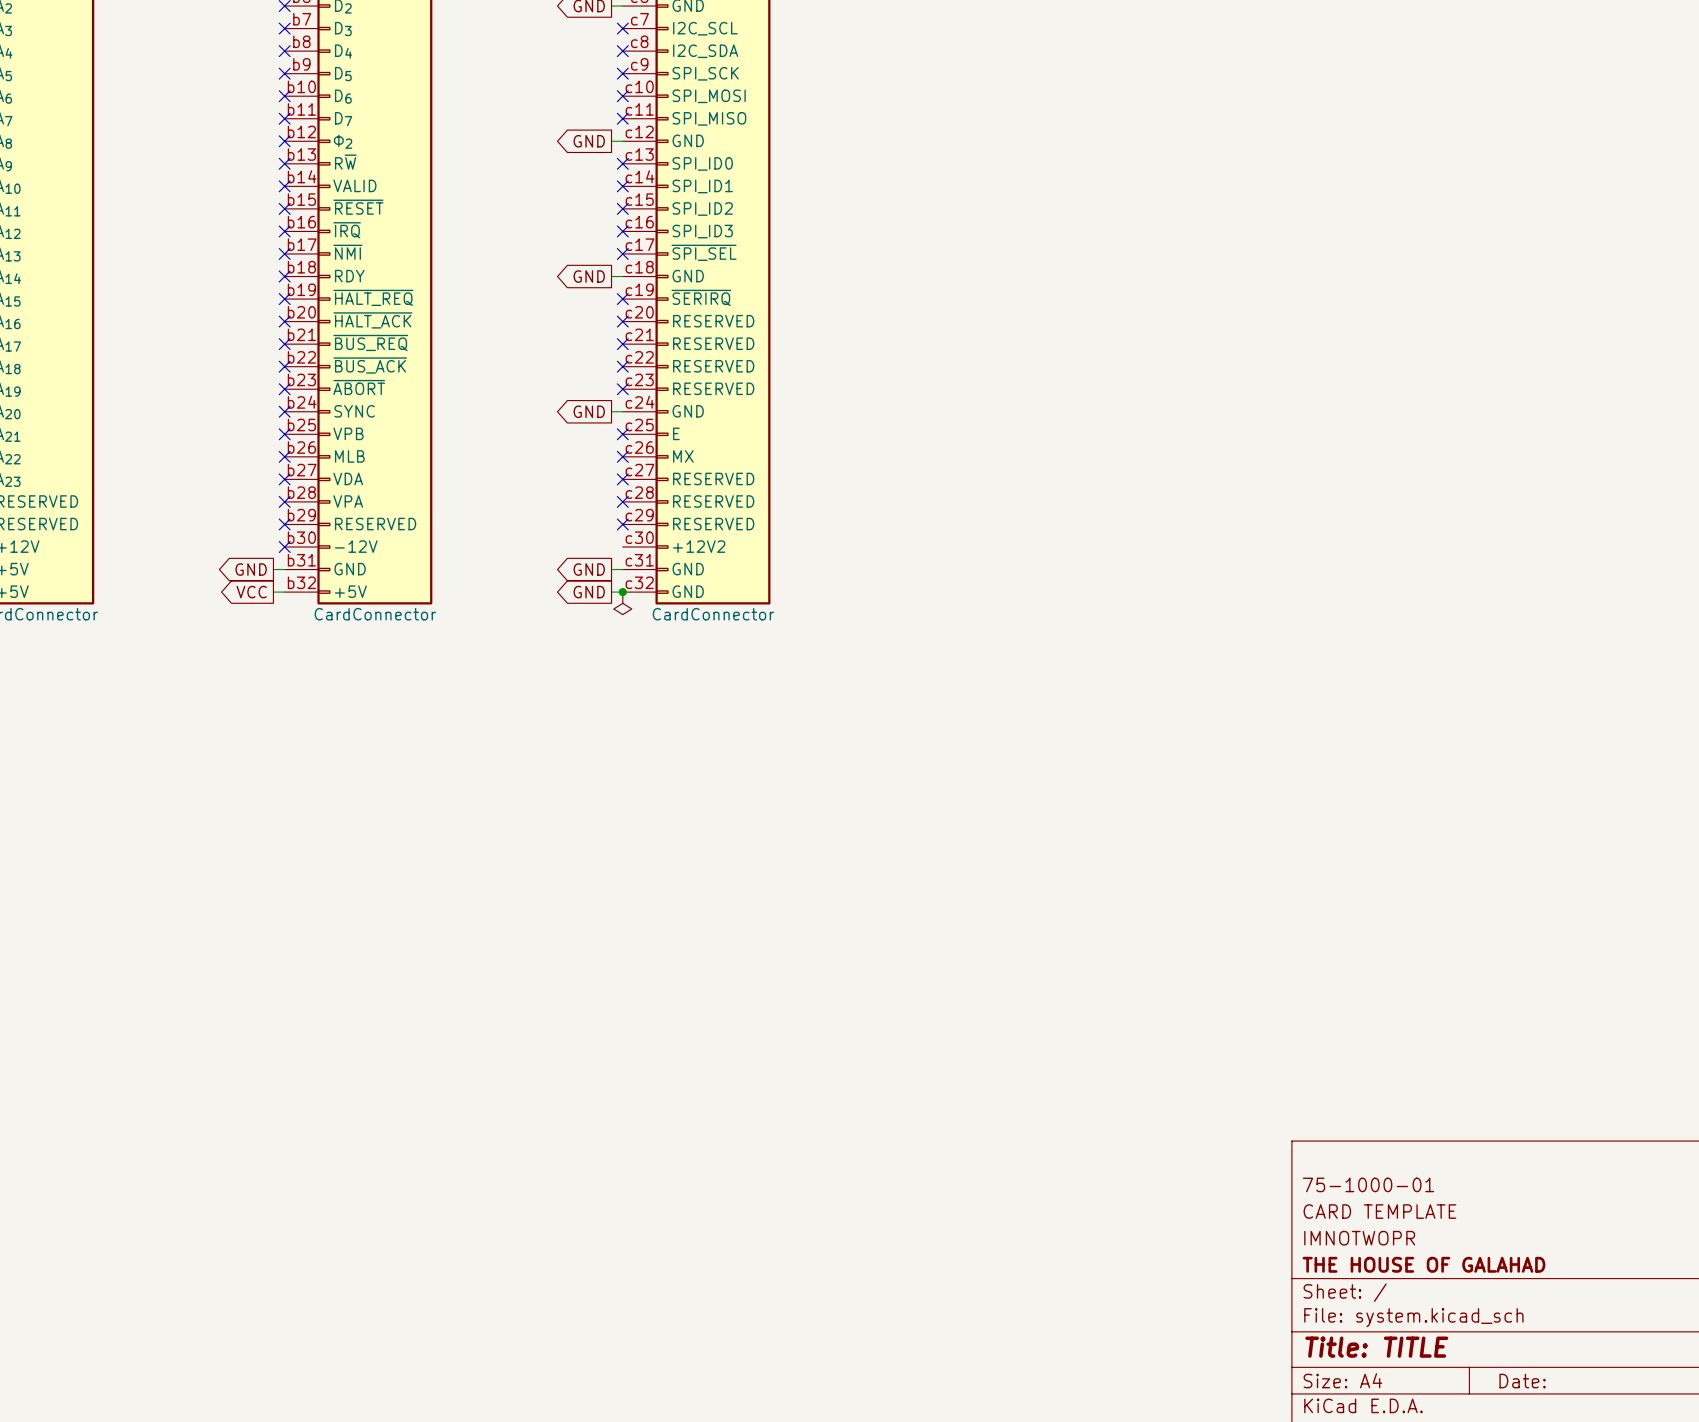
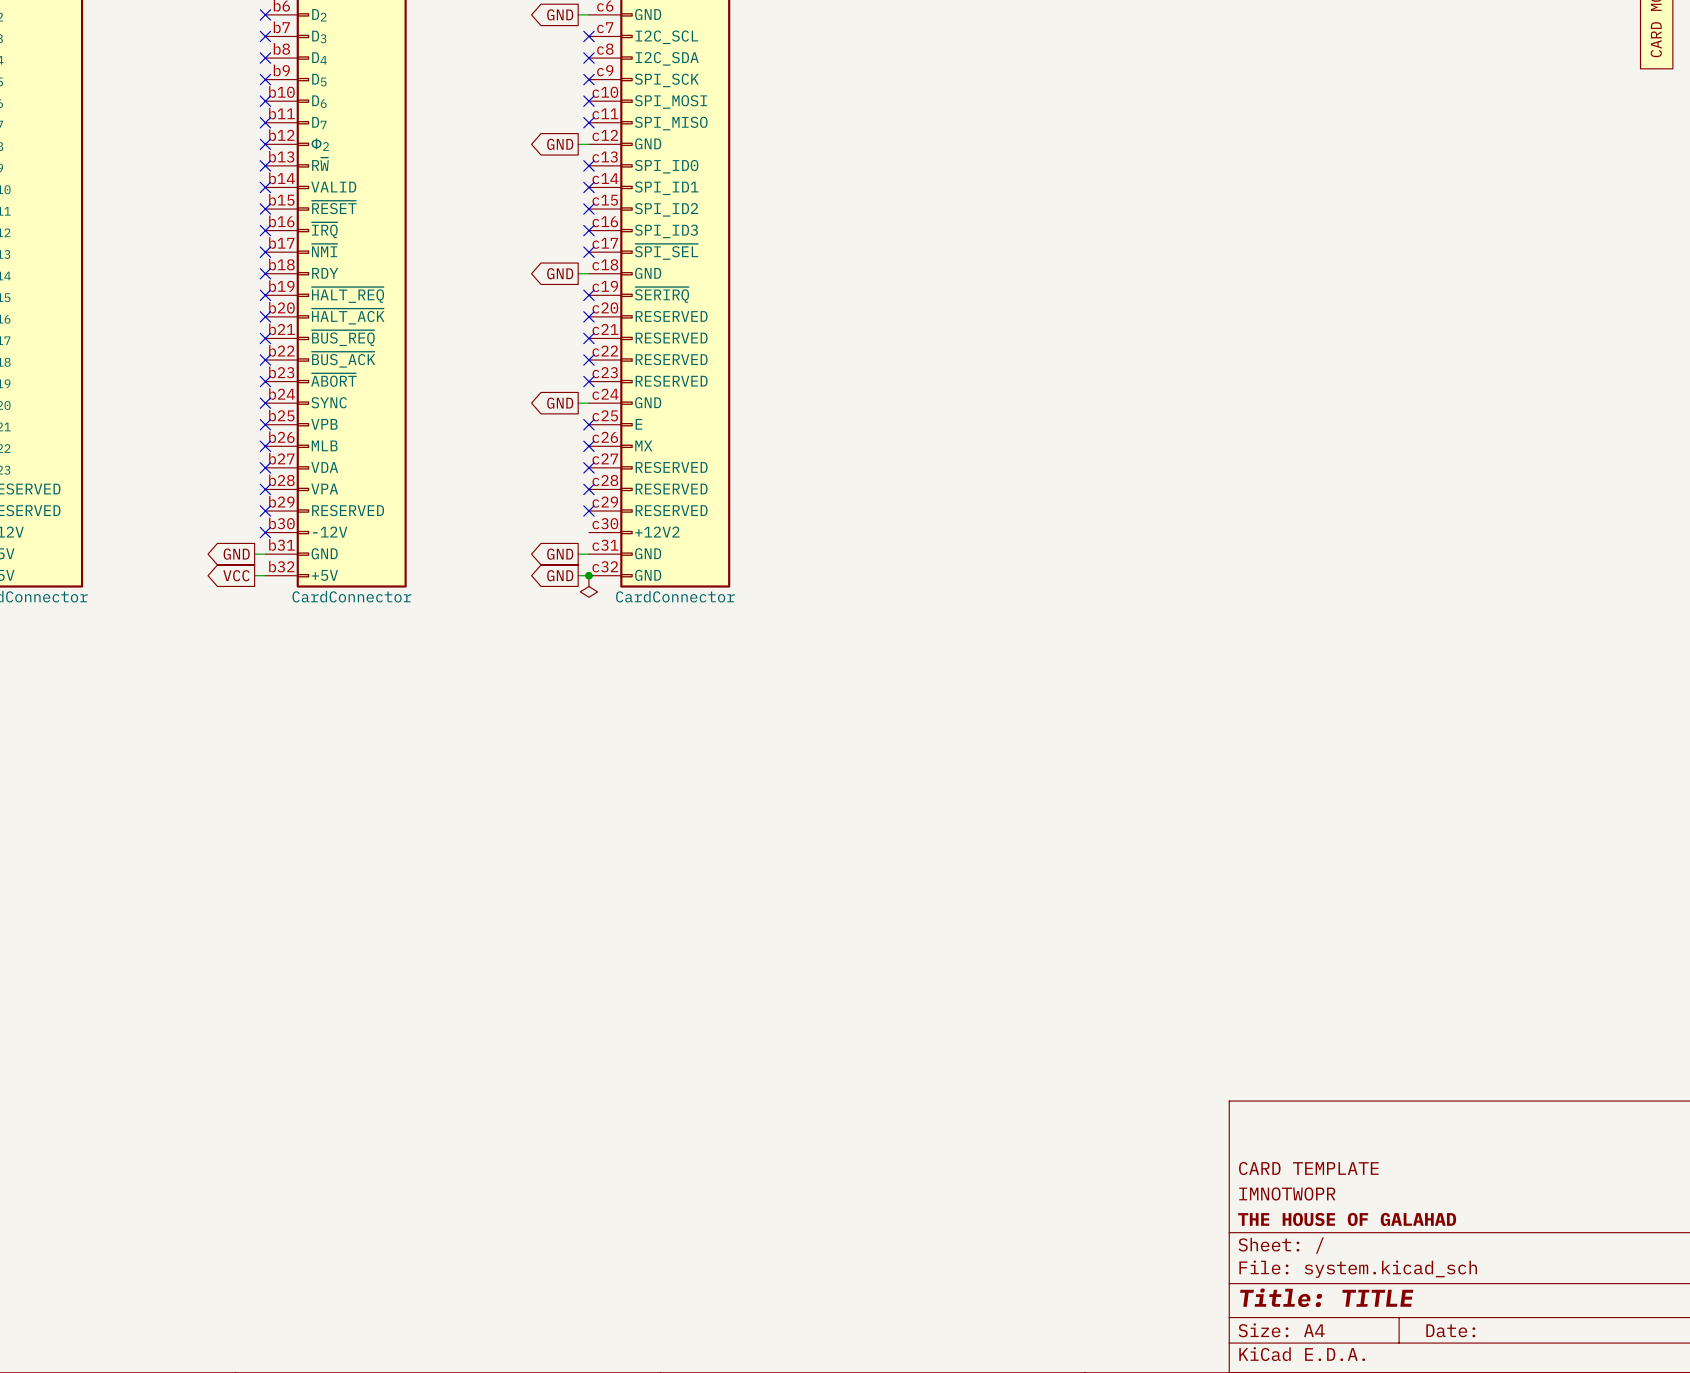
title block: 75-1000-01 (1368, 1184) -> none

